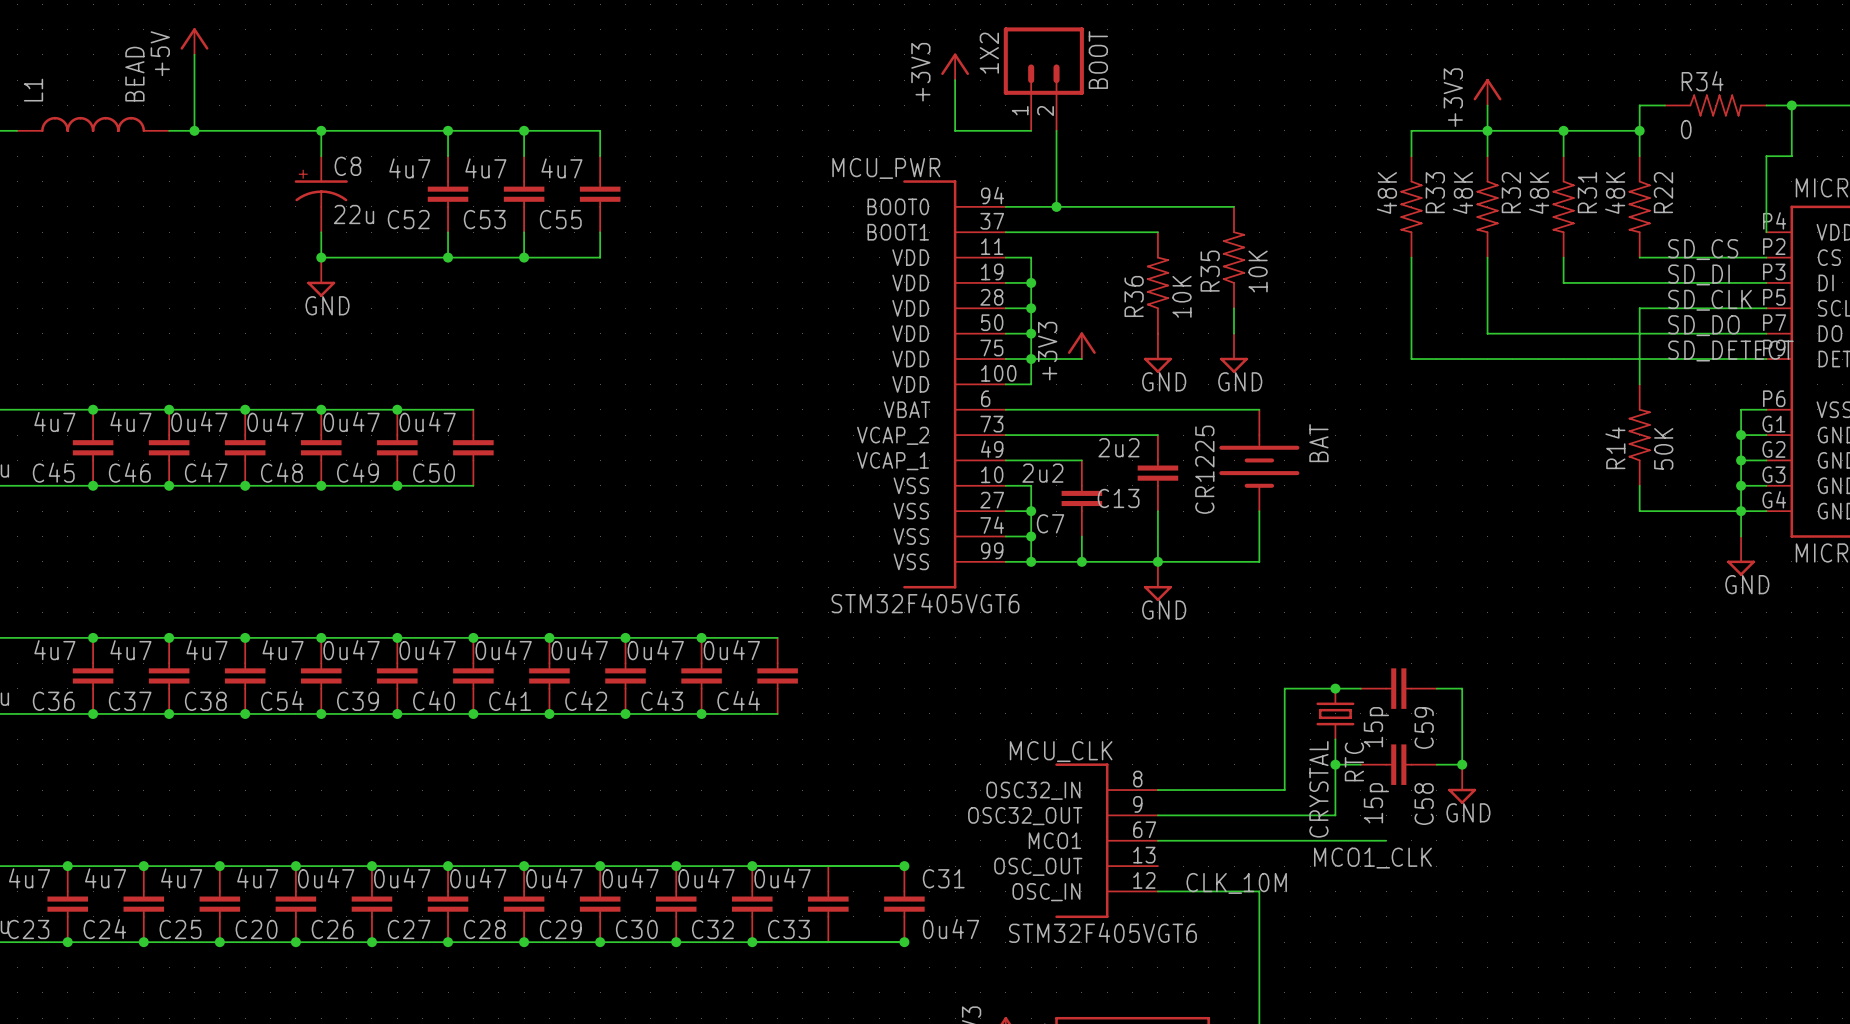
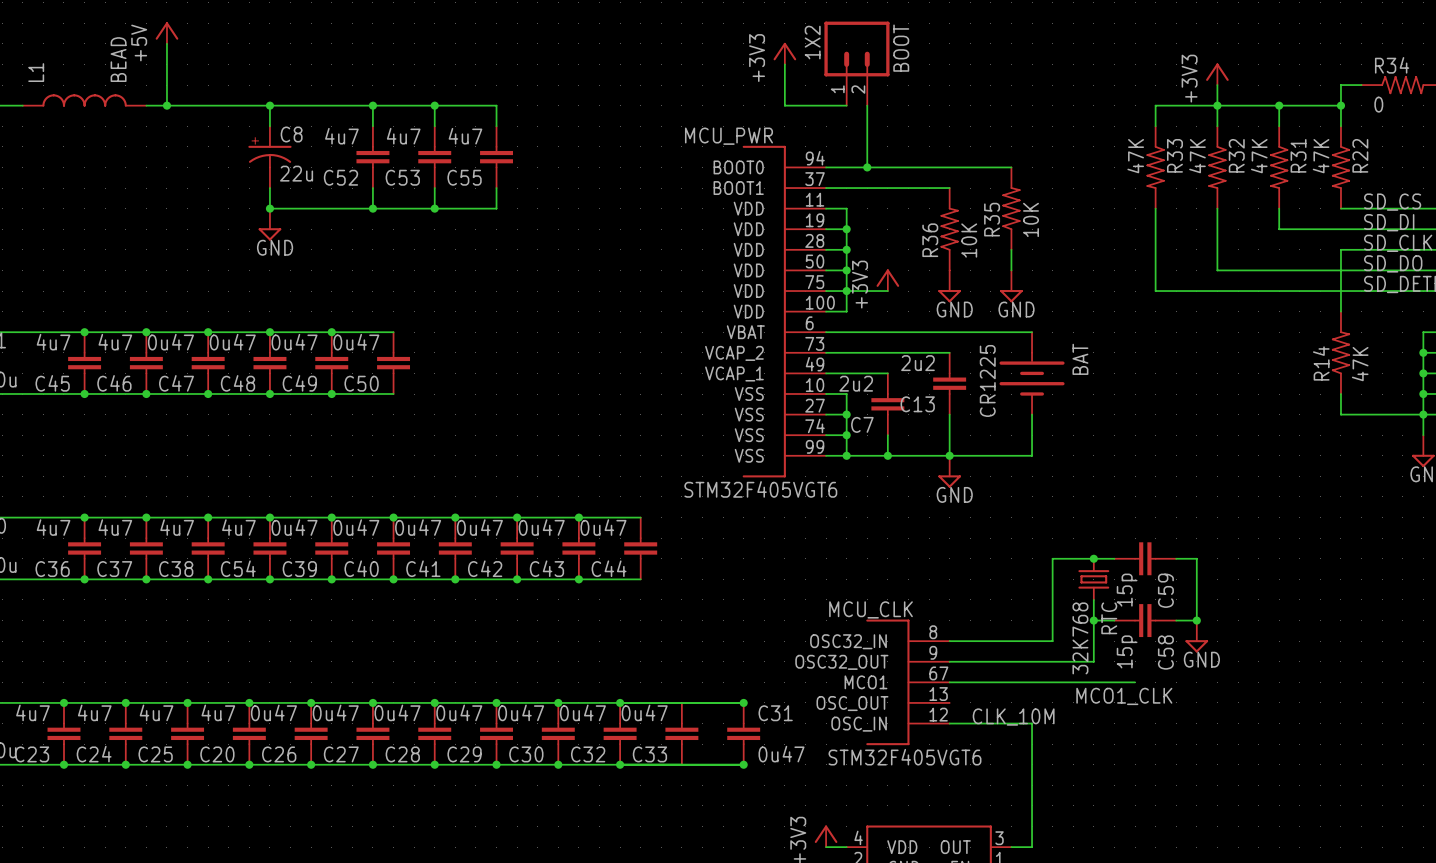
R33 value: 48K (1386, 193) -> 47K (1135, 156)
R32 value: 48K (1463, 193) -> 47K (1197, 156)
R31 value: 48K (1539, 193) -> 47K (1259, 156)
R22 value: 48K (1615, 193) -> 47K (1321, 156)
R14 value: 50K (1663, 448) -> 47K (1360, 364)
RTC value: CRYSTAL (1318, 789) -> 32K768 (1080, 638)

